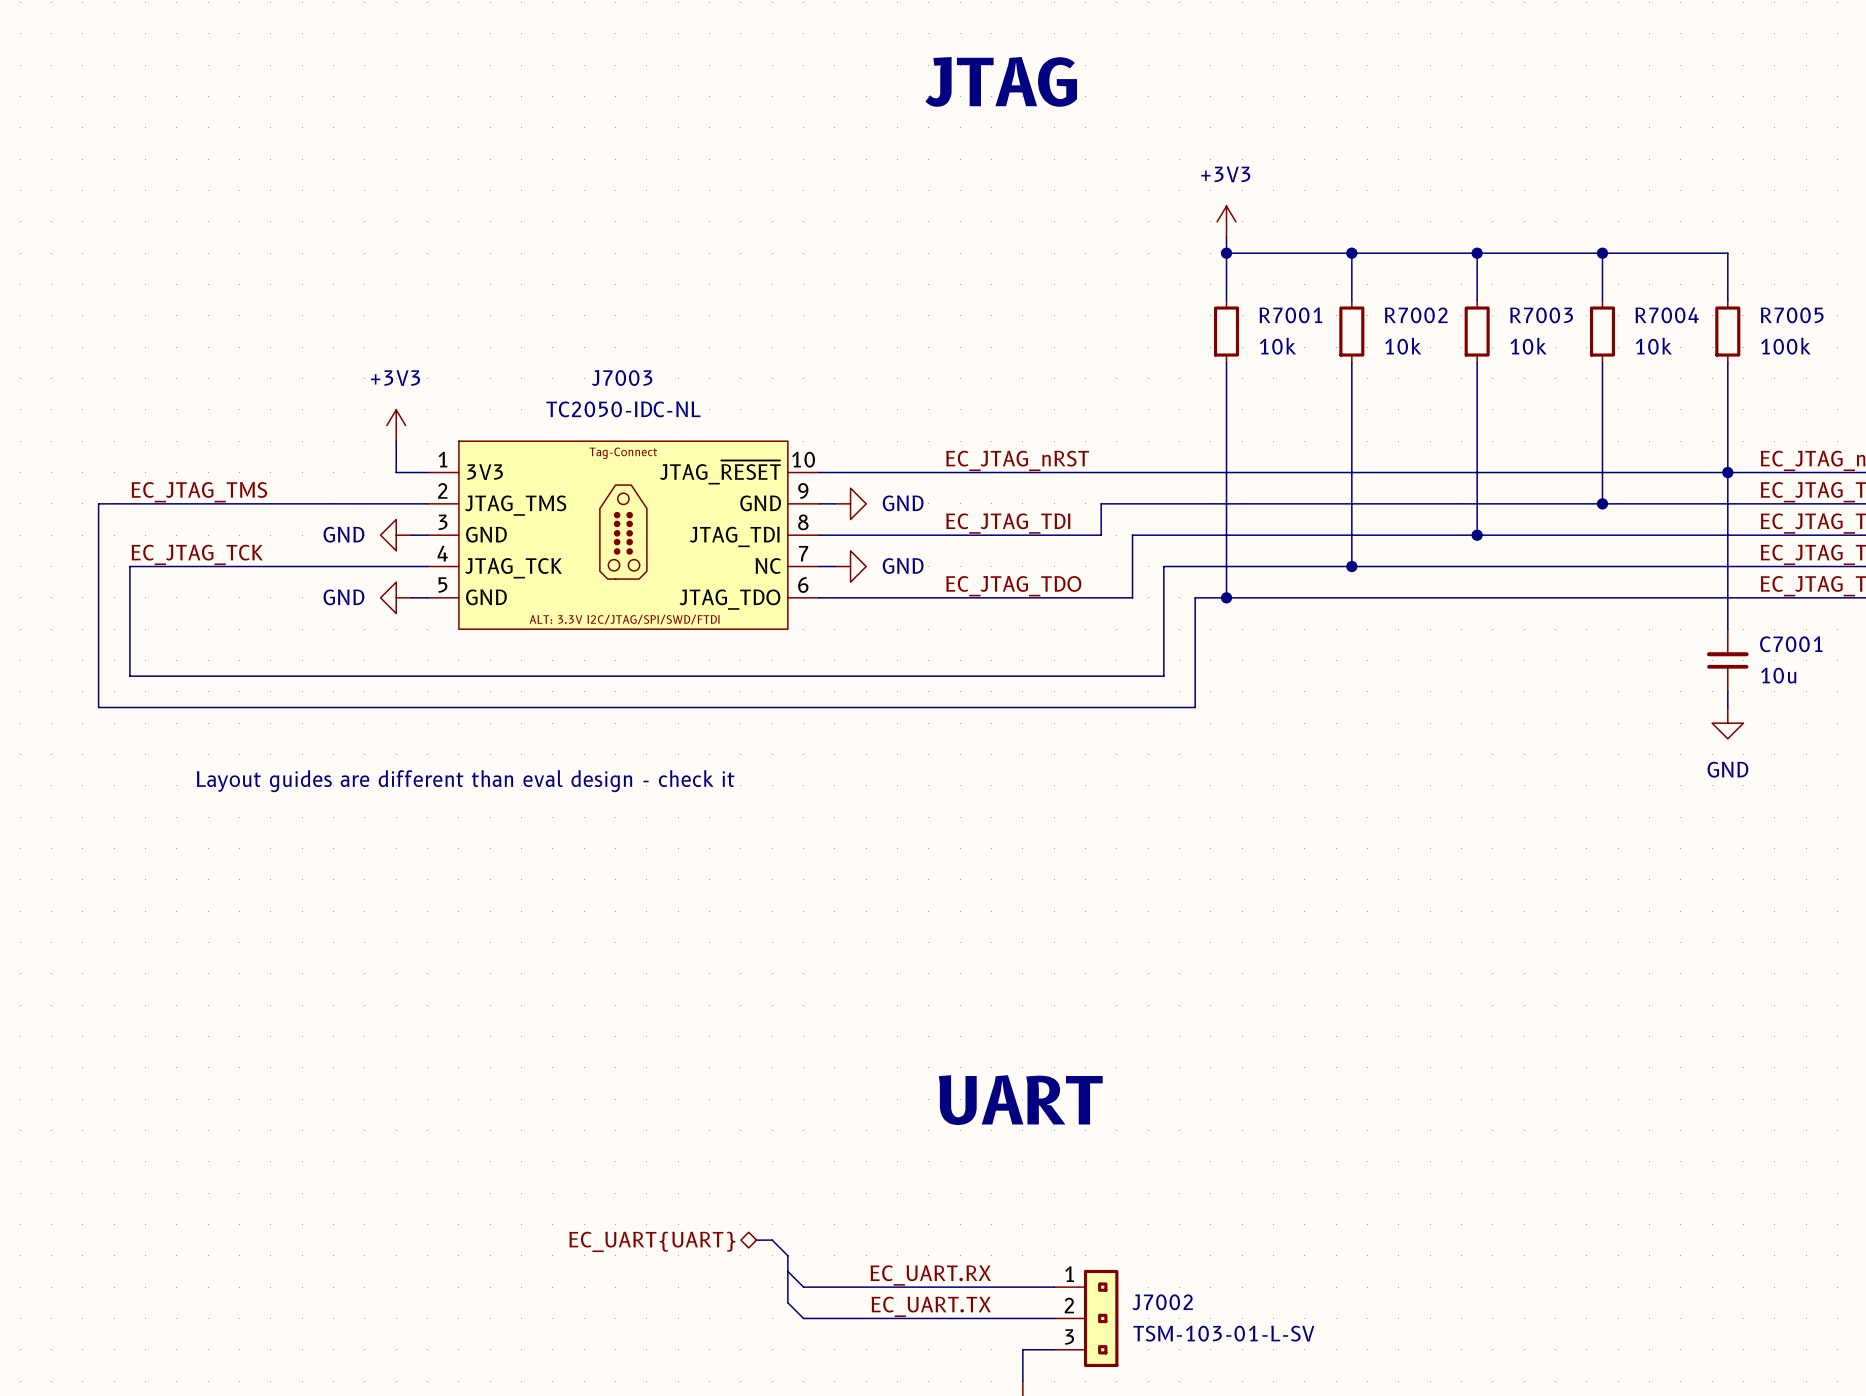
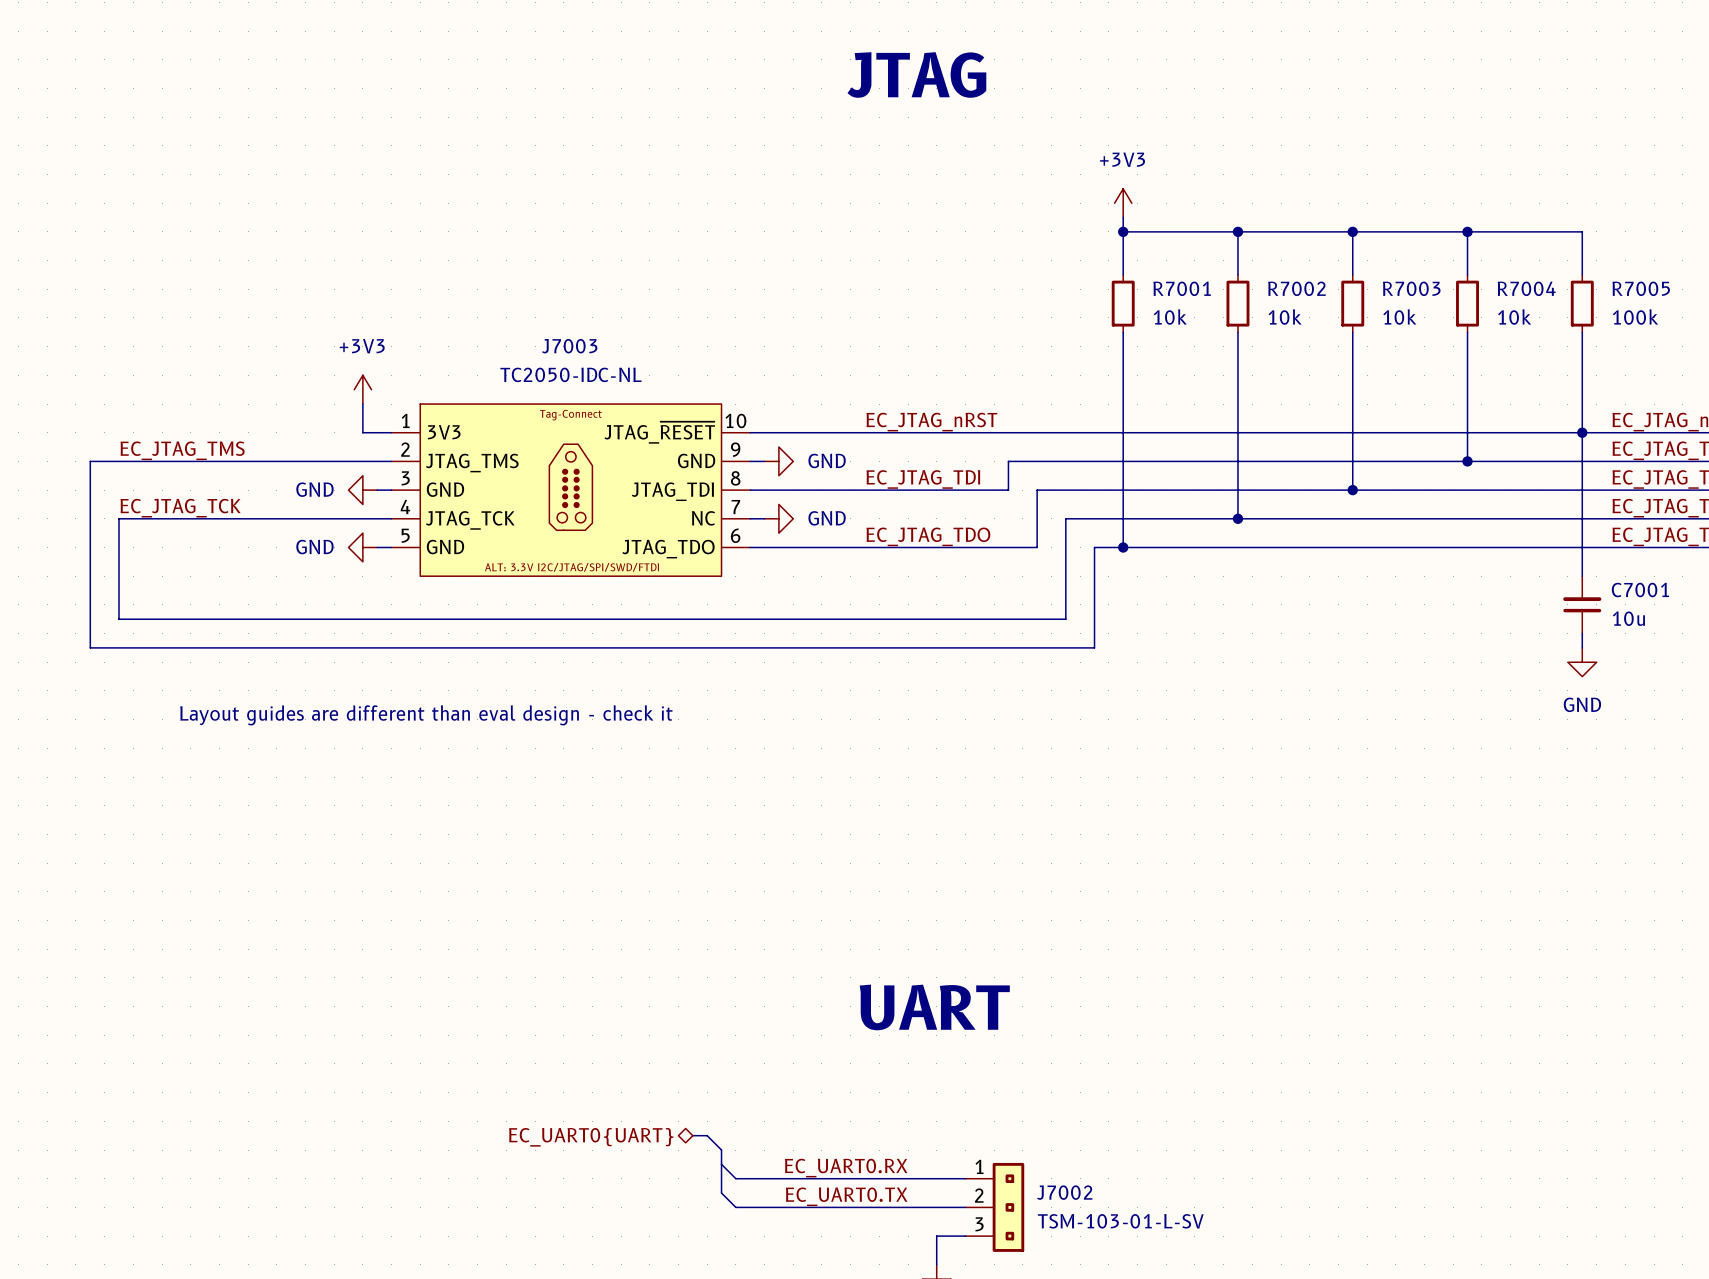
hierarchical label: EC_UART{UART} (652, 1241) -> EC_UART0{UART} (591, 1137)
label: EC_UART.RX (930, 1275) -> EC_UART0.RX (846, 1168)
label: EC_UART.TX (931, 1306) -> EC_UART0.TX (846, 1196)

